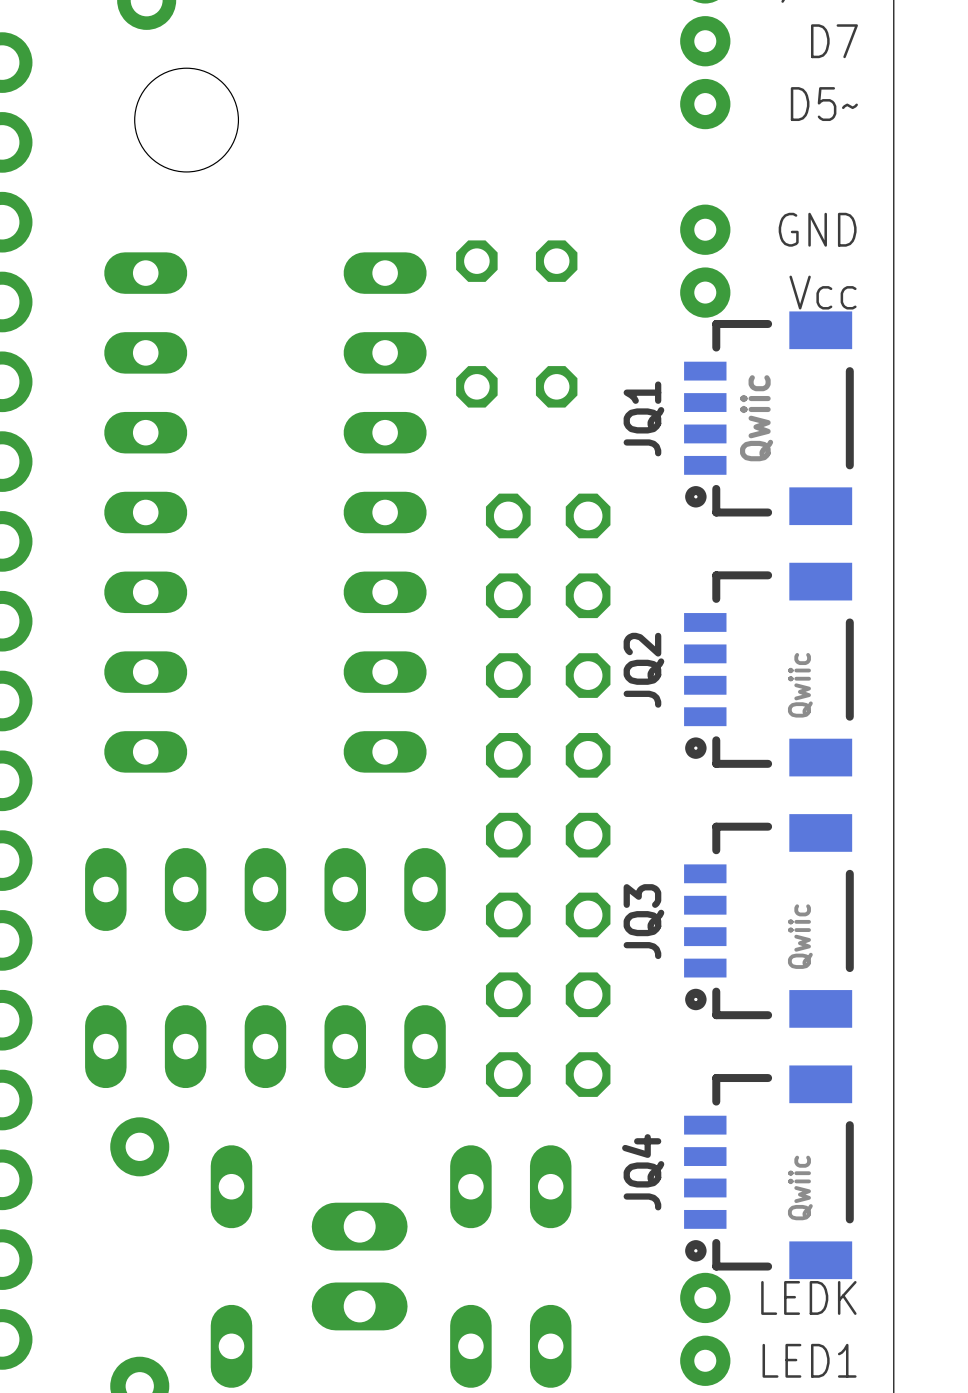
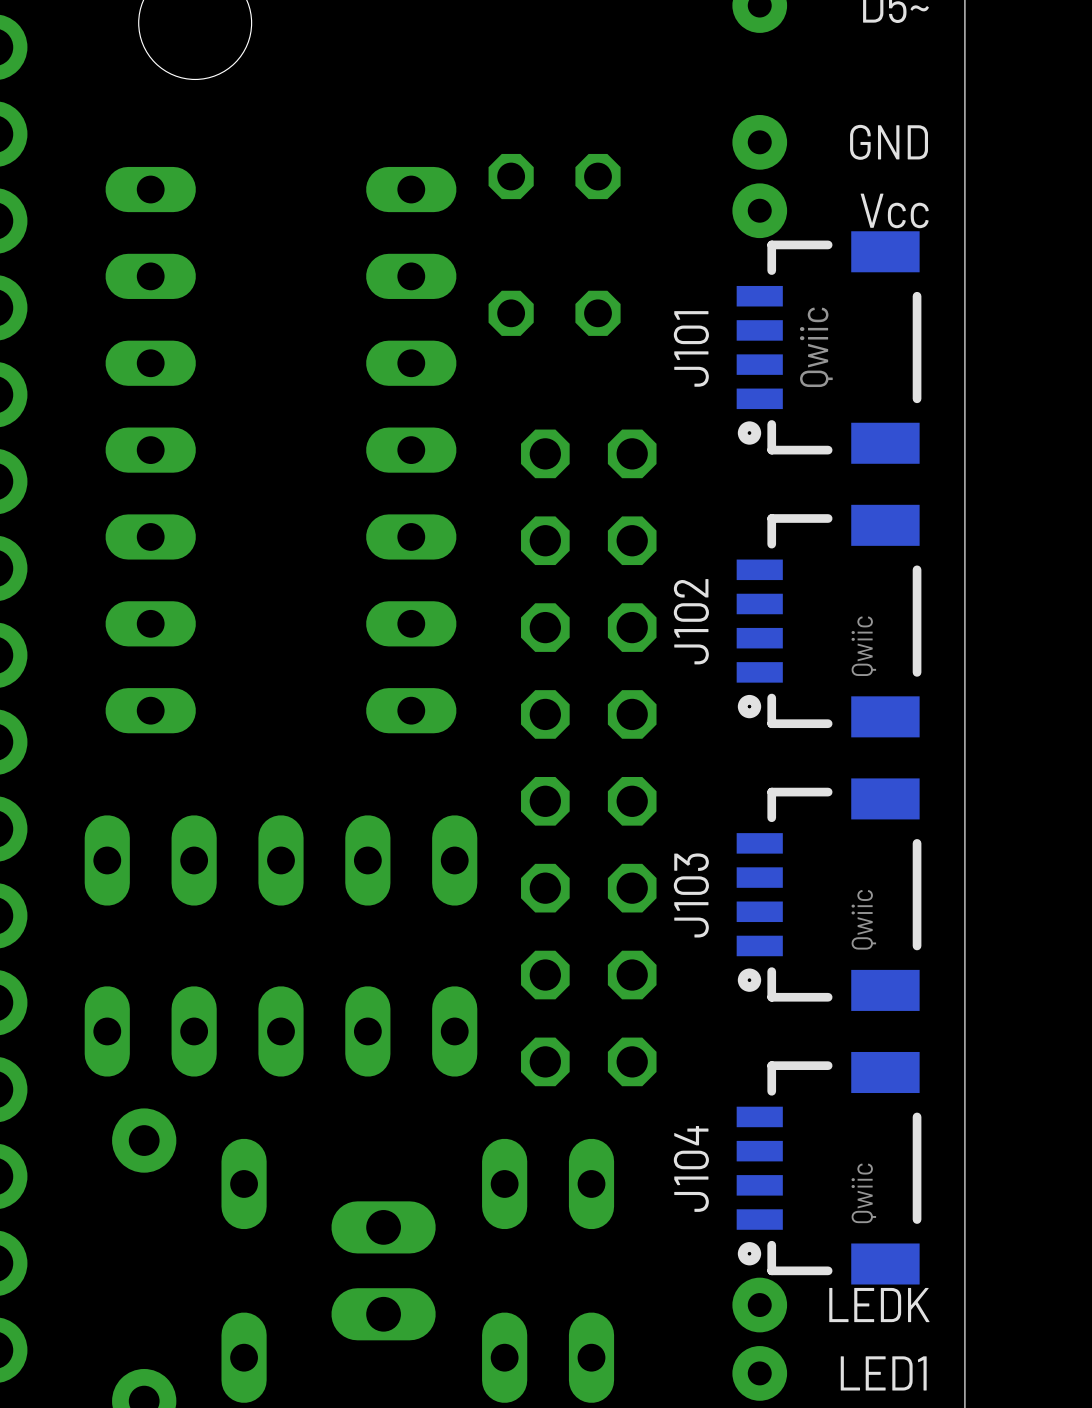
JQ1 name: JQ1 (643, 418) -> J101 (691, 348)
JQ2 name: JQ2 (643, 670) -> J102 (691, 621)
JQ3 name: JQ3 (643, 921) -> J103 (691, 895)
JQ4 name: JQ4 (643, 1172) -> J104 (691, 1168)

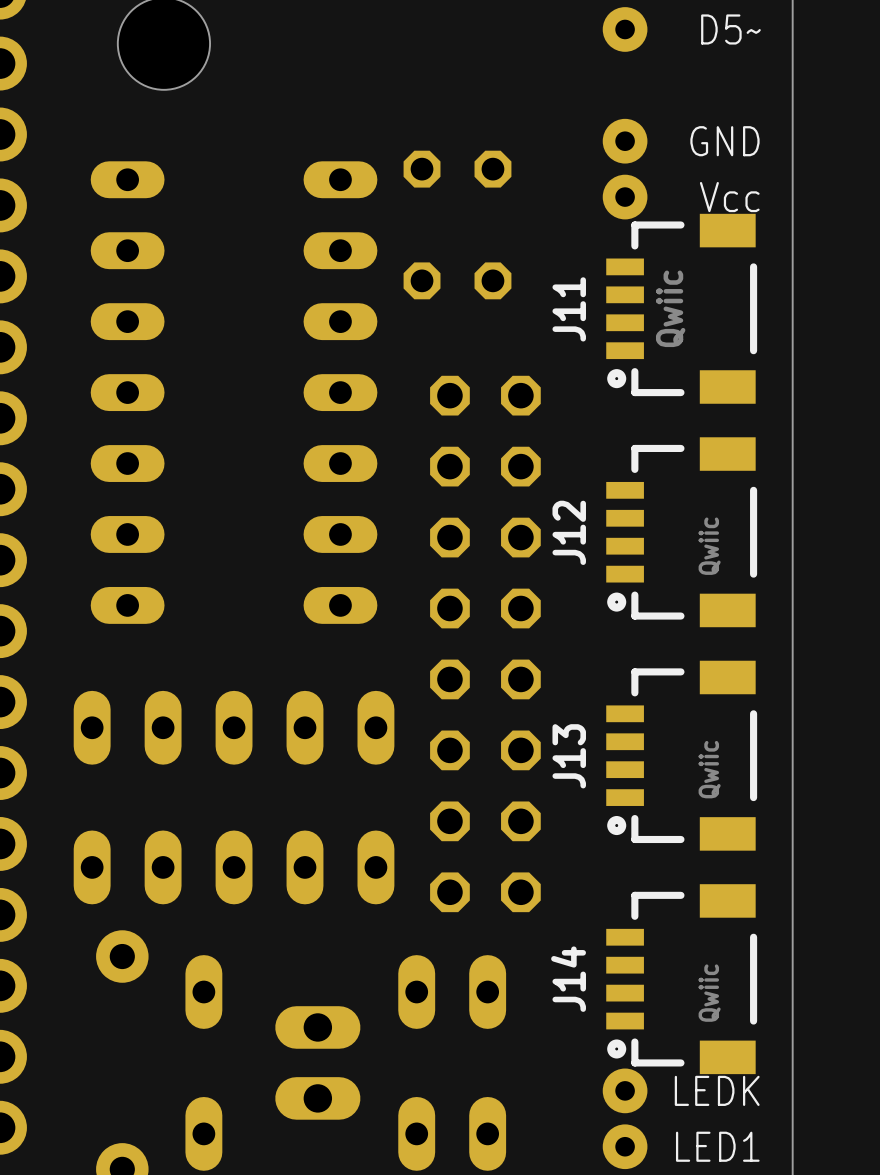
J101 name: J101 (691, 348) -> J11 (569, 309)
J102 name: J102 (691, 621) -> J12 (569, 532)
J103 name: J103 (691, 895) -> J13 (569, 756)
J104 name: J104 (691, 1168) -> J14 (568, 979)

